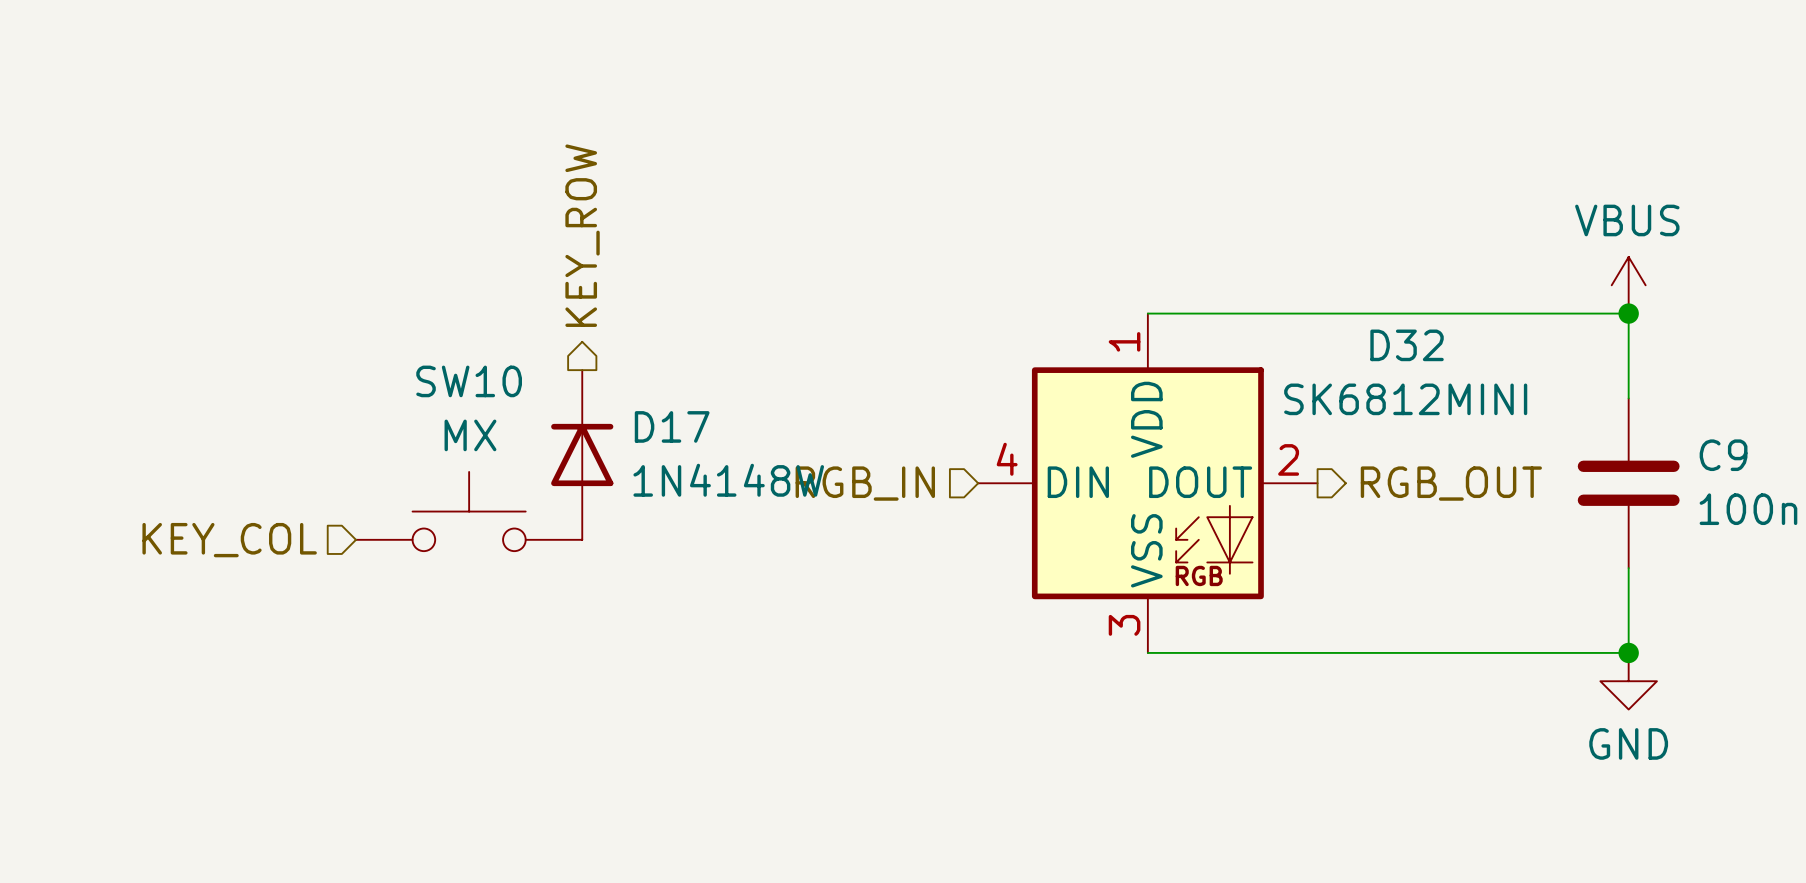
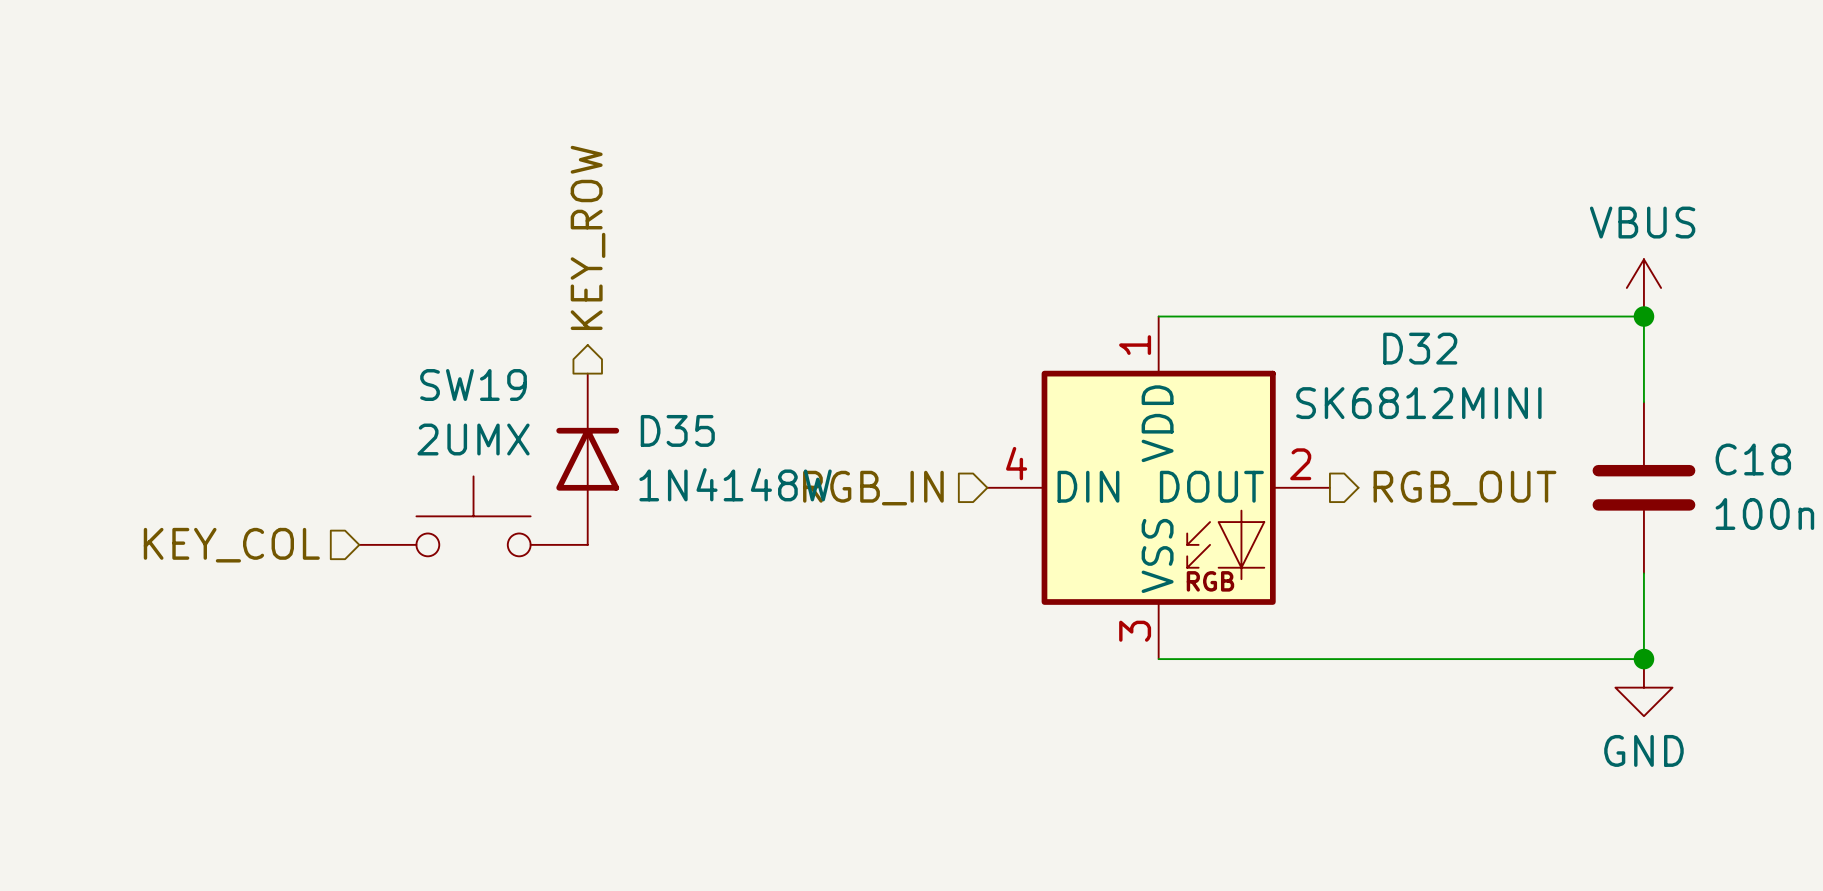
SW10 name: SW10 (469, 381) -> SW19 (473, 385)
D17 name: D17 (672, 426) -> D35 (677, 430)
SW10 value: MX (470, 435) -> 2UMX (473, 439)
C9 name: C9 (1723, 455) -> C18 (1753, 459)

